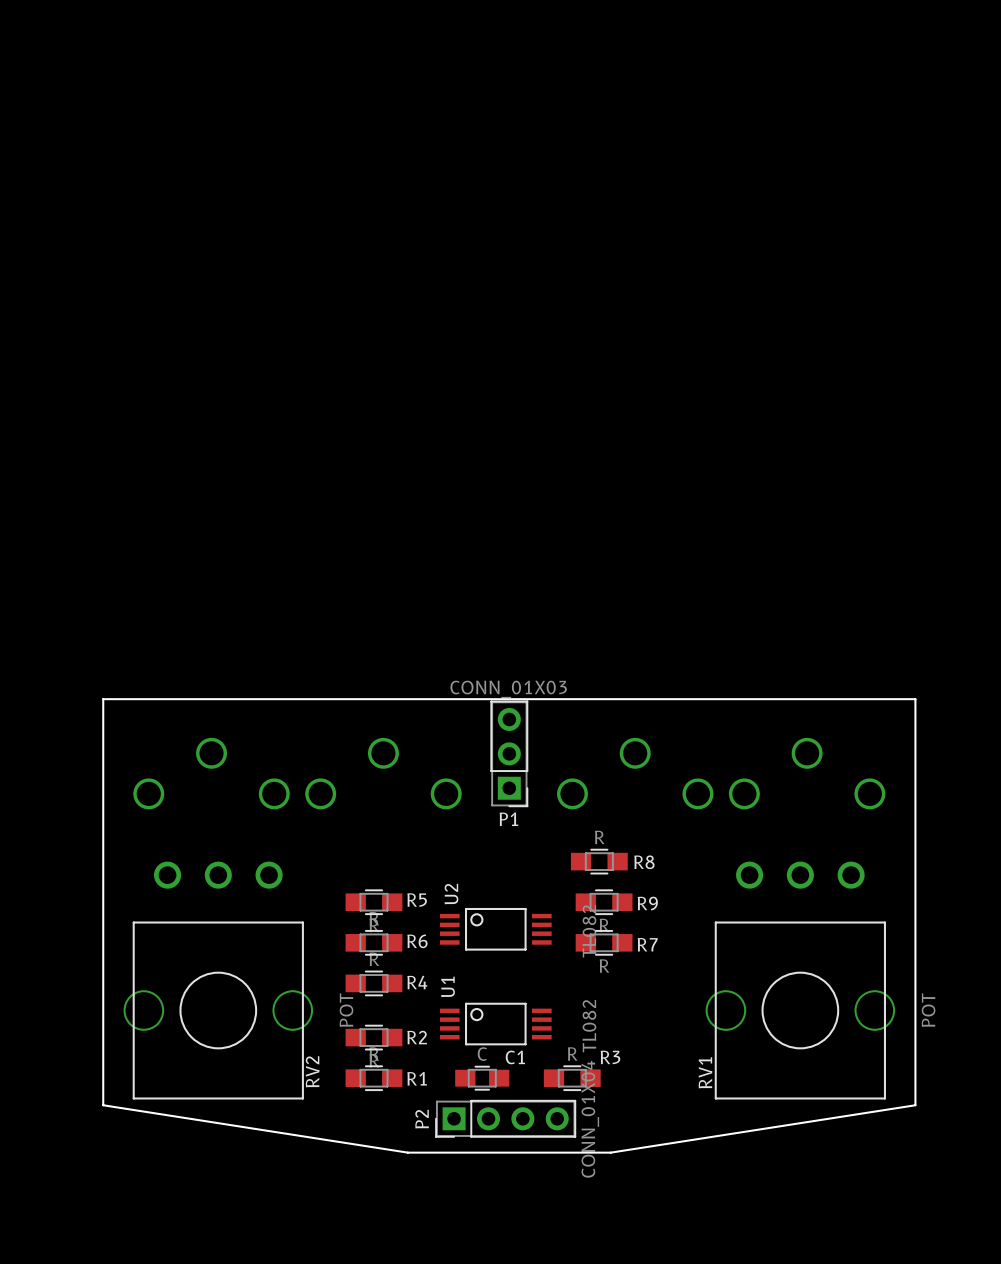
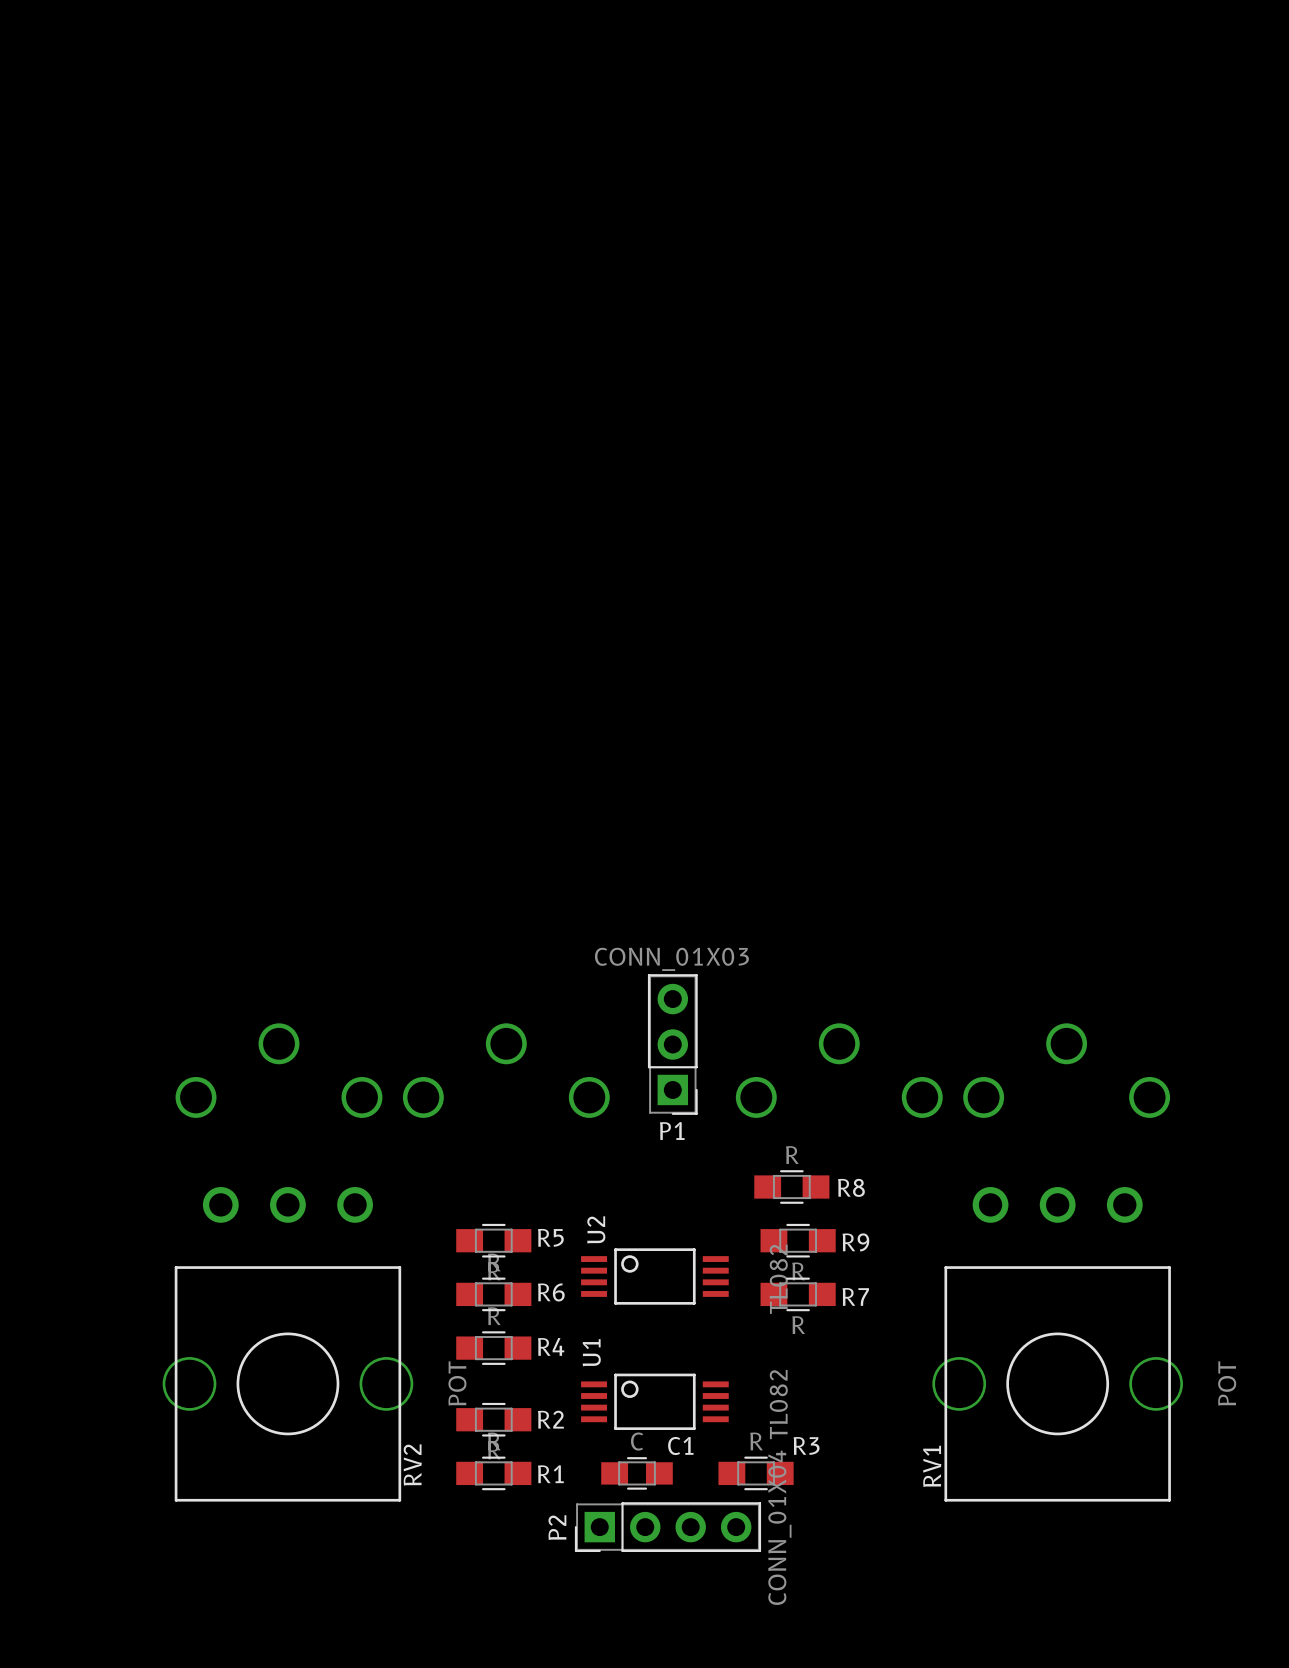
board edge: (103, 699) (915, 699) (915, 1105) (610, 1152) (407, 1152) (103, 1105) (103, 699) -> none

